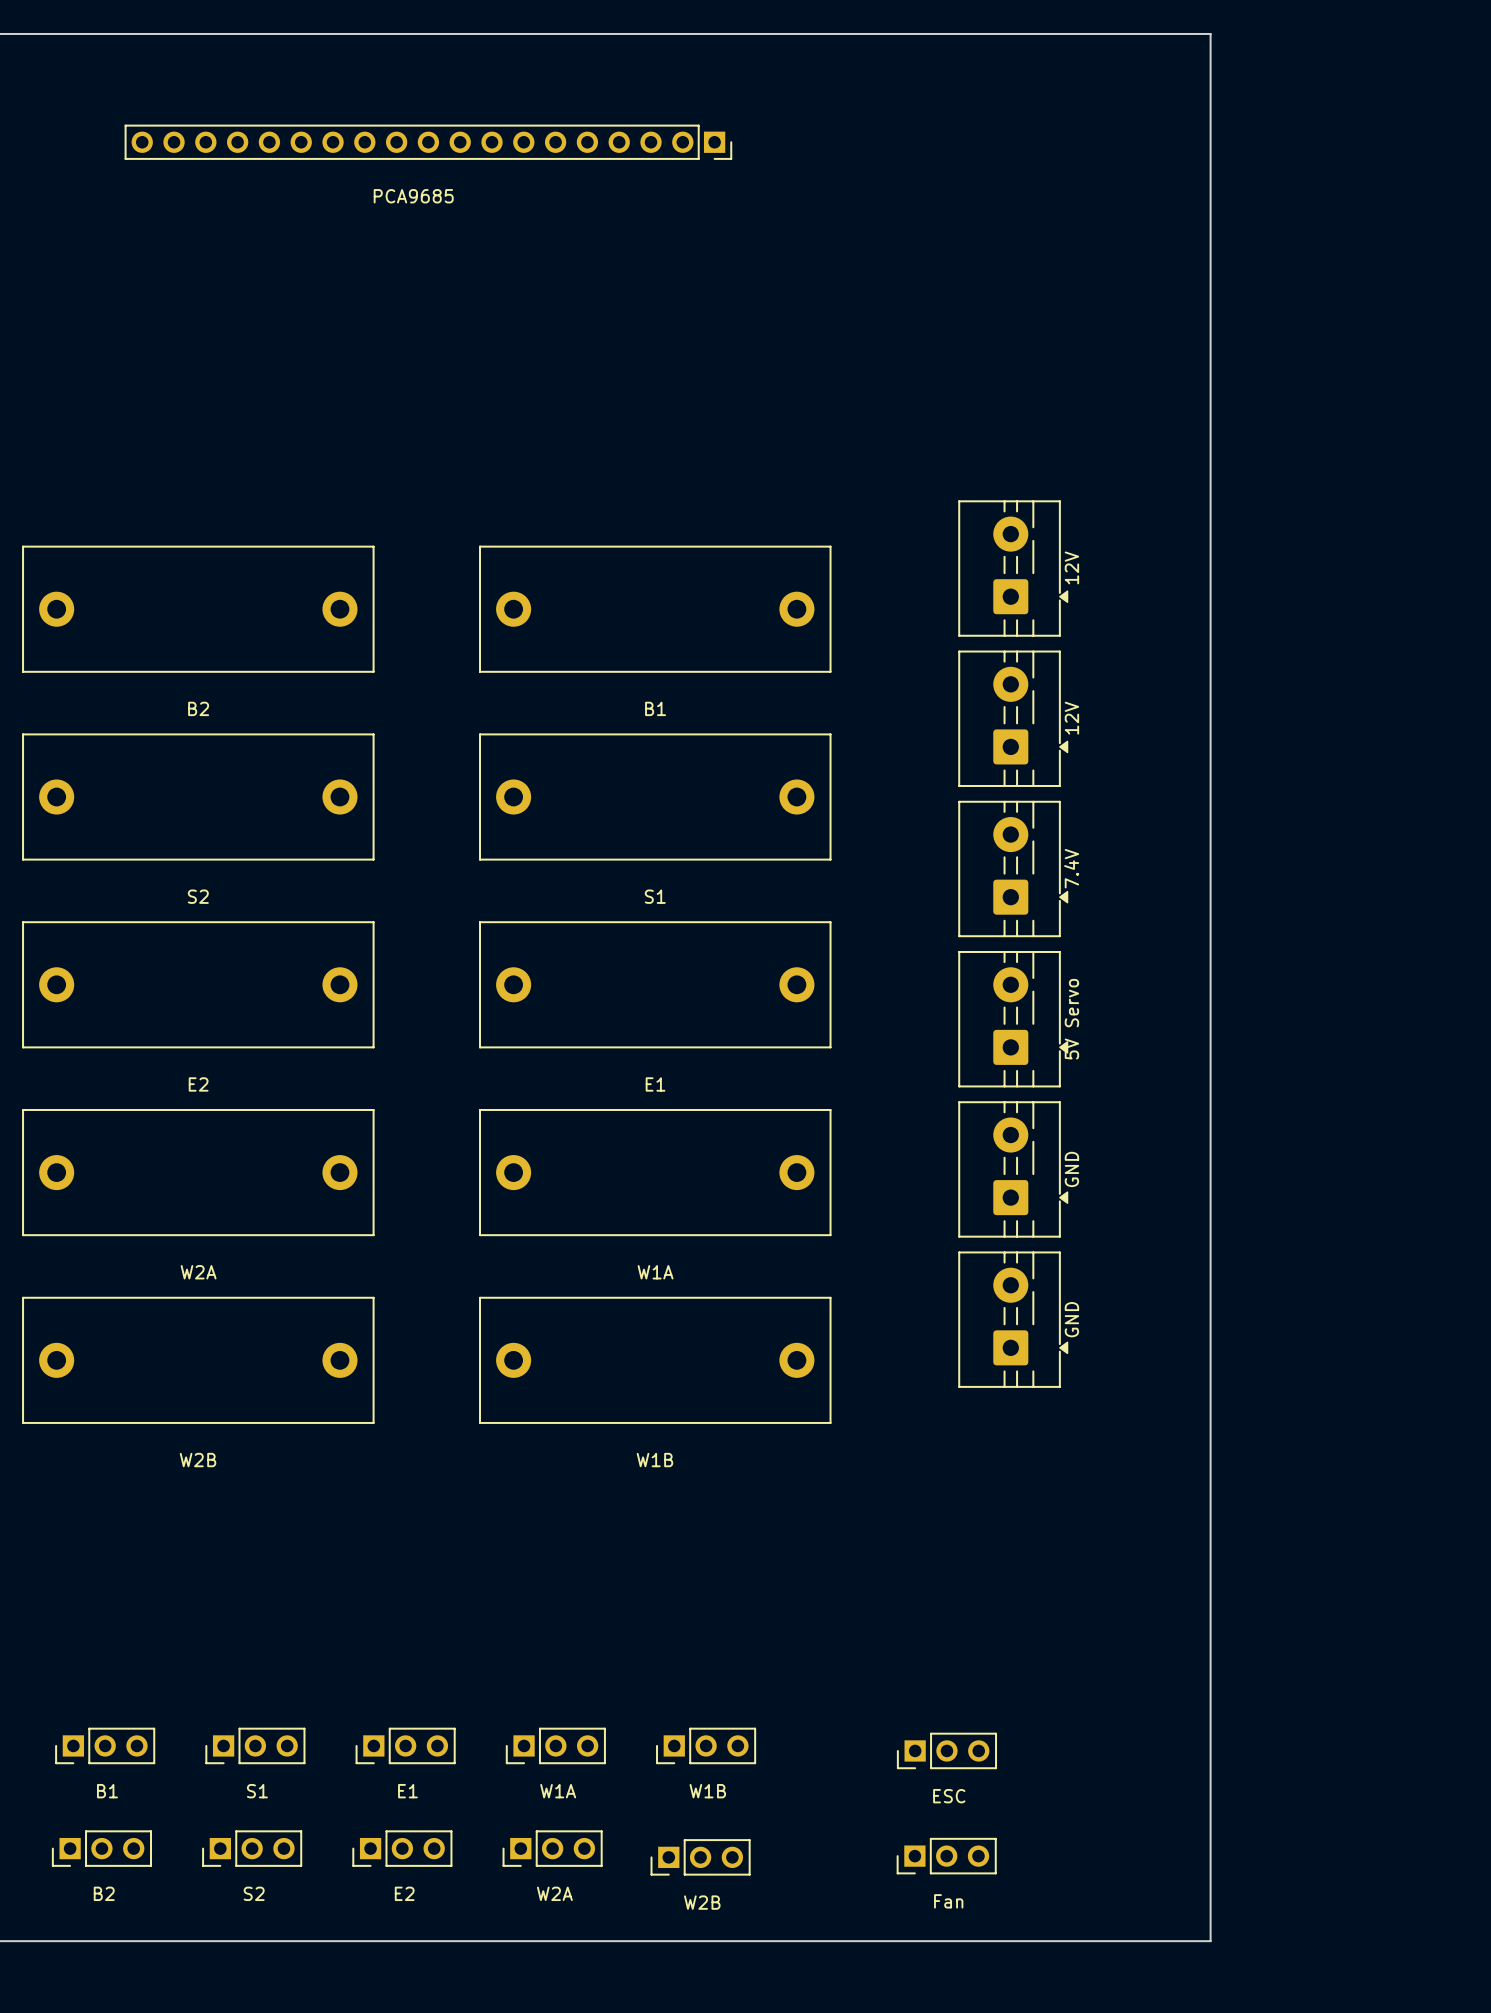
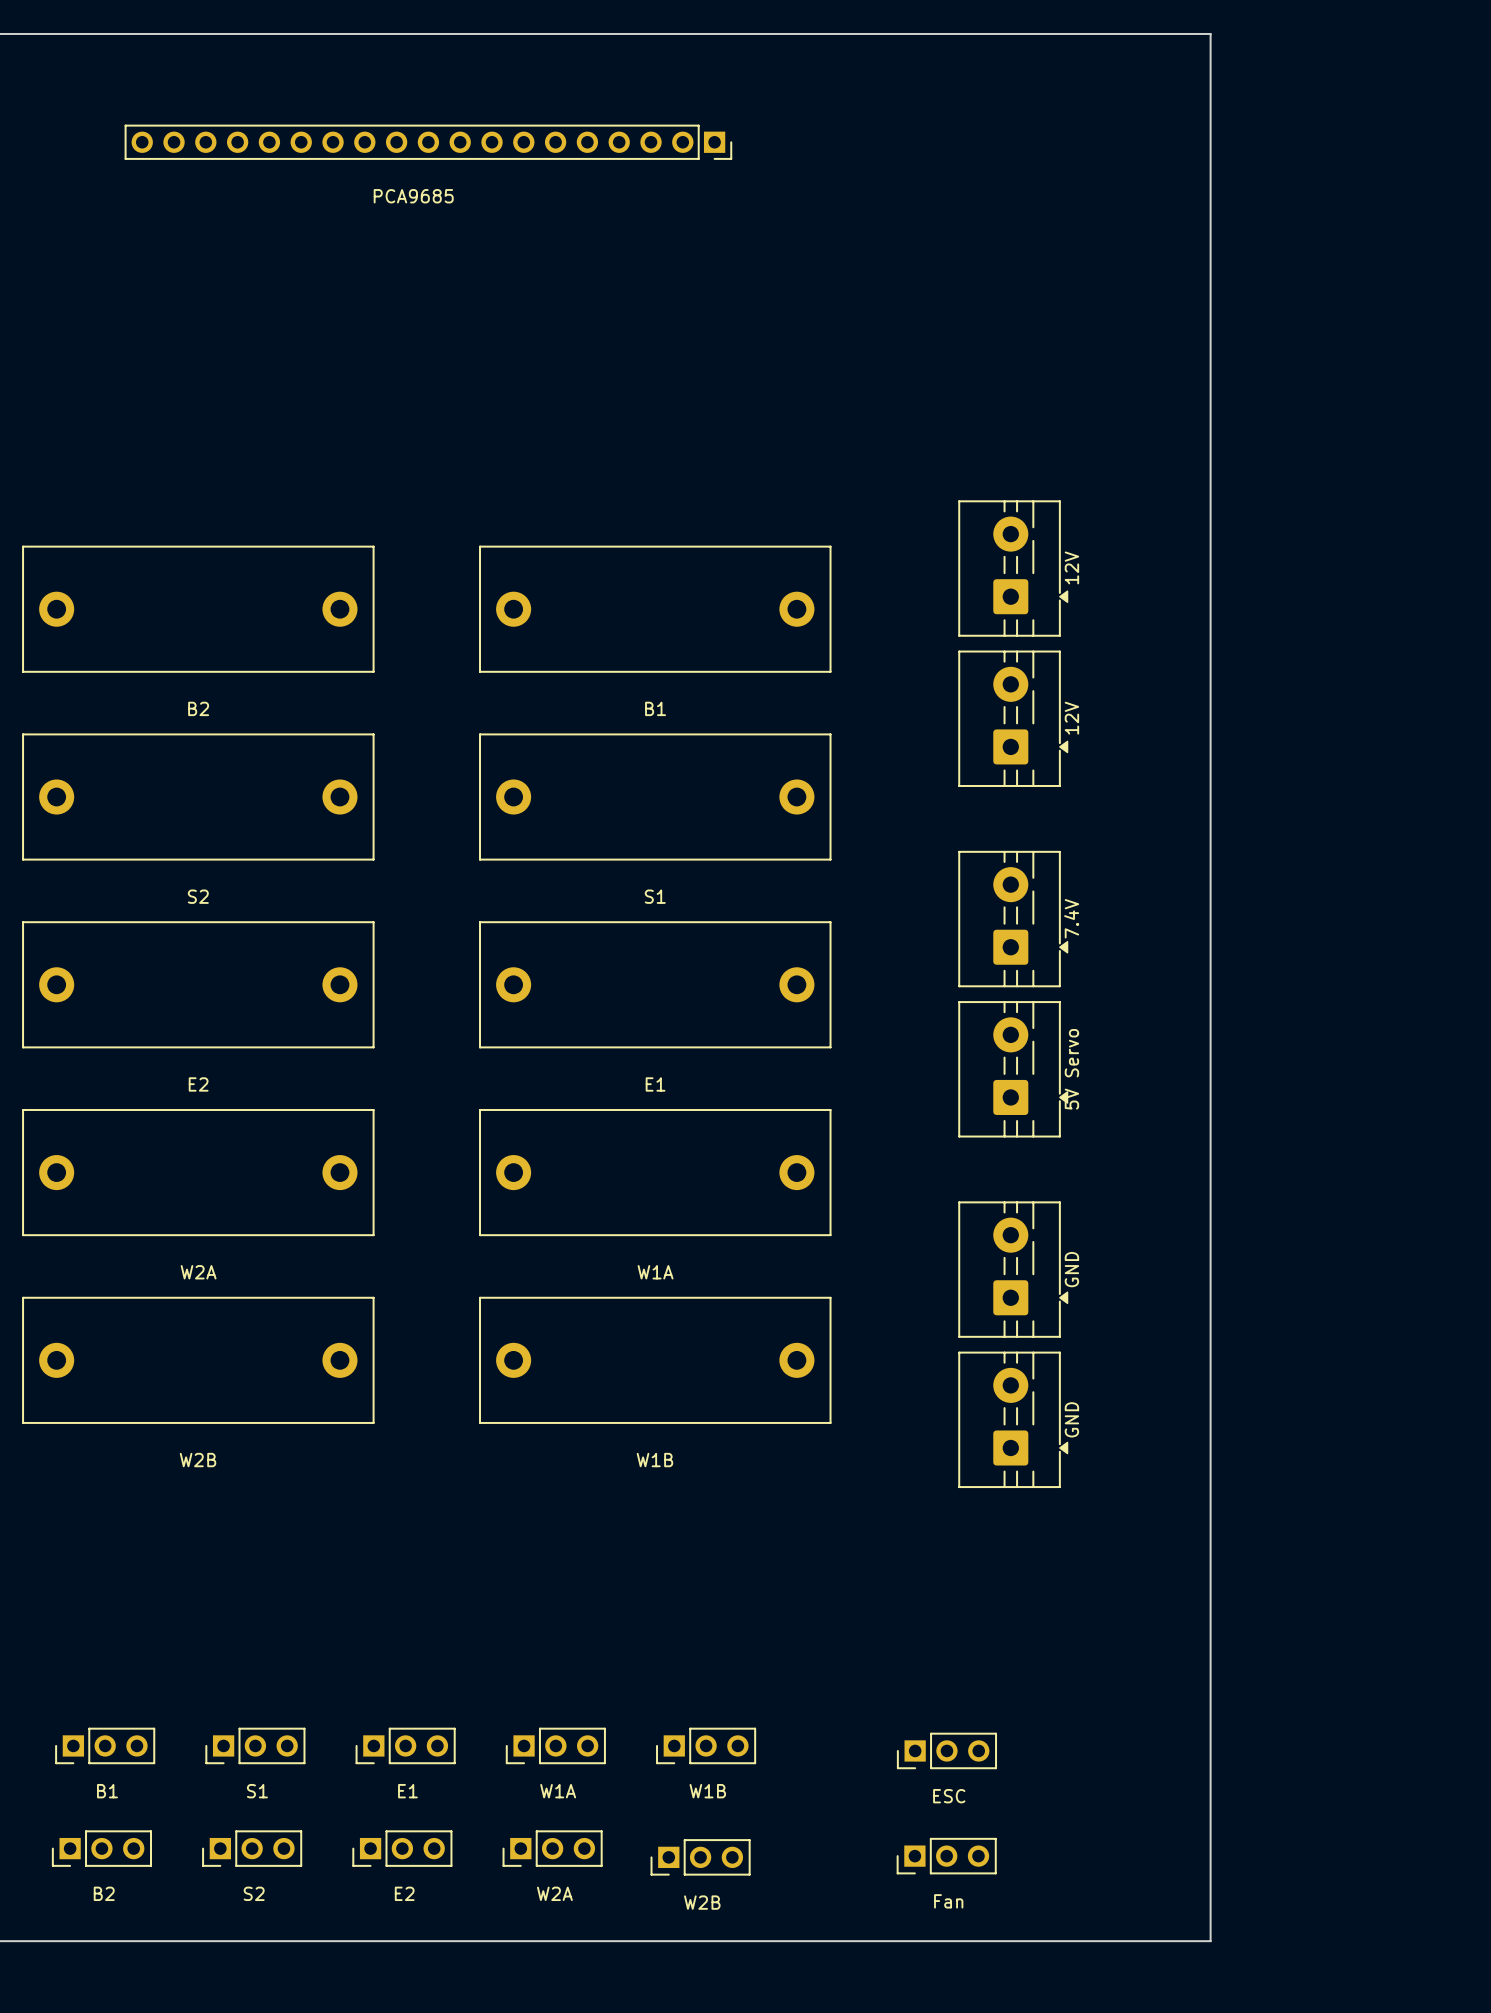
part position: (1013, 868) -> (1013, 919)
part position: (1013, 1019) -> (1013, 1069)
part: GND (1013, 1169) -> none
part: none -> GND (1013, 1269)
part: GND (1013, 1319) -> none
part: none -> GND (1013, 1419)

